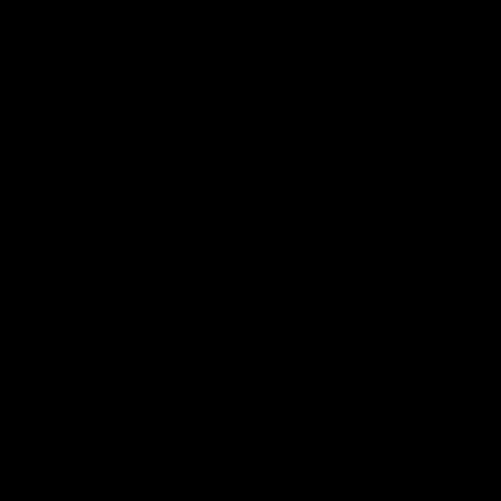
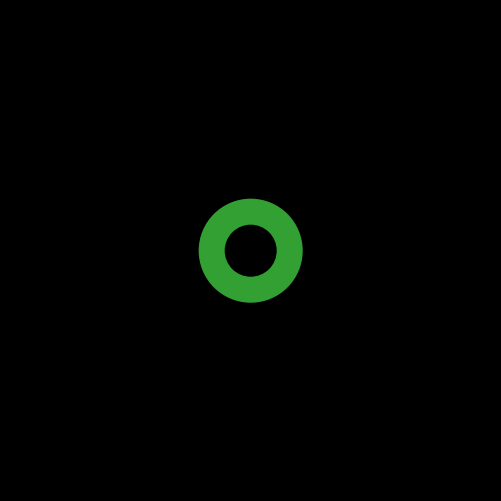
part: none -> (250, 250)

